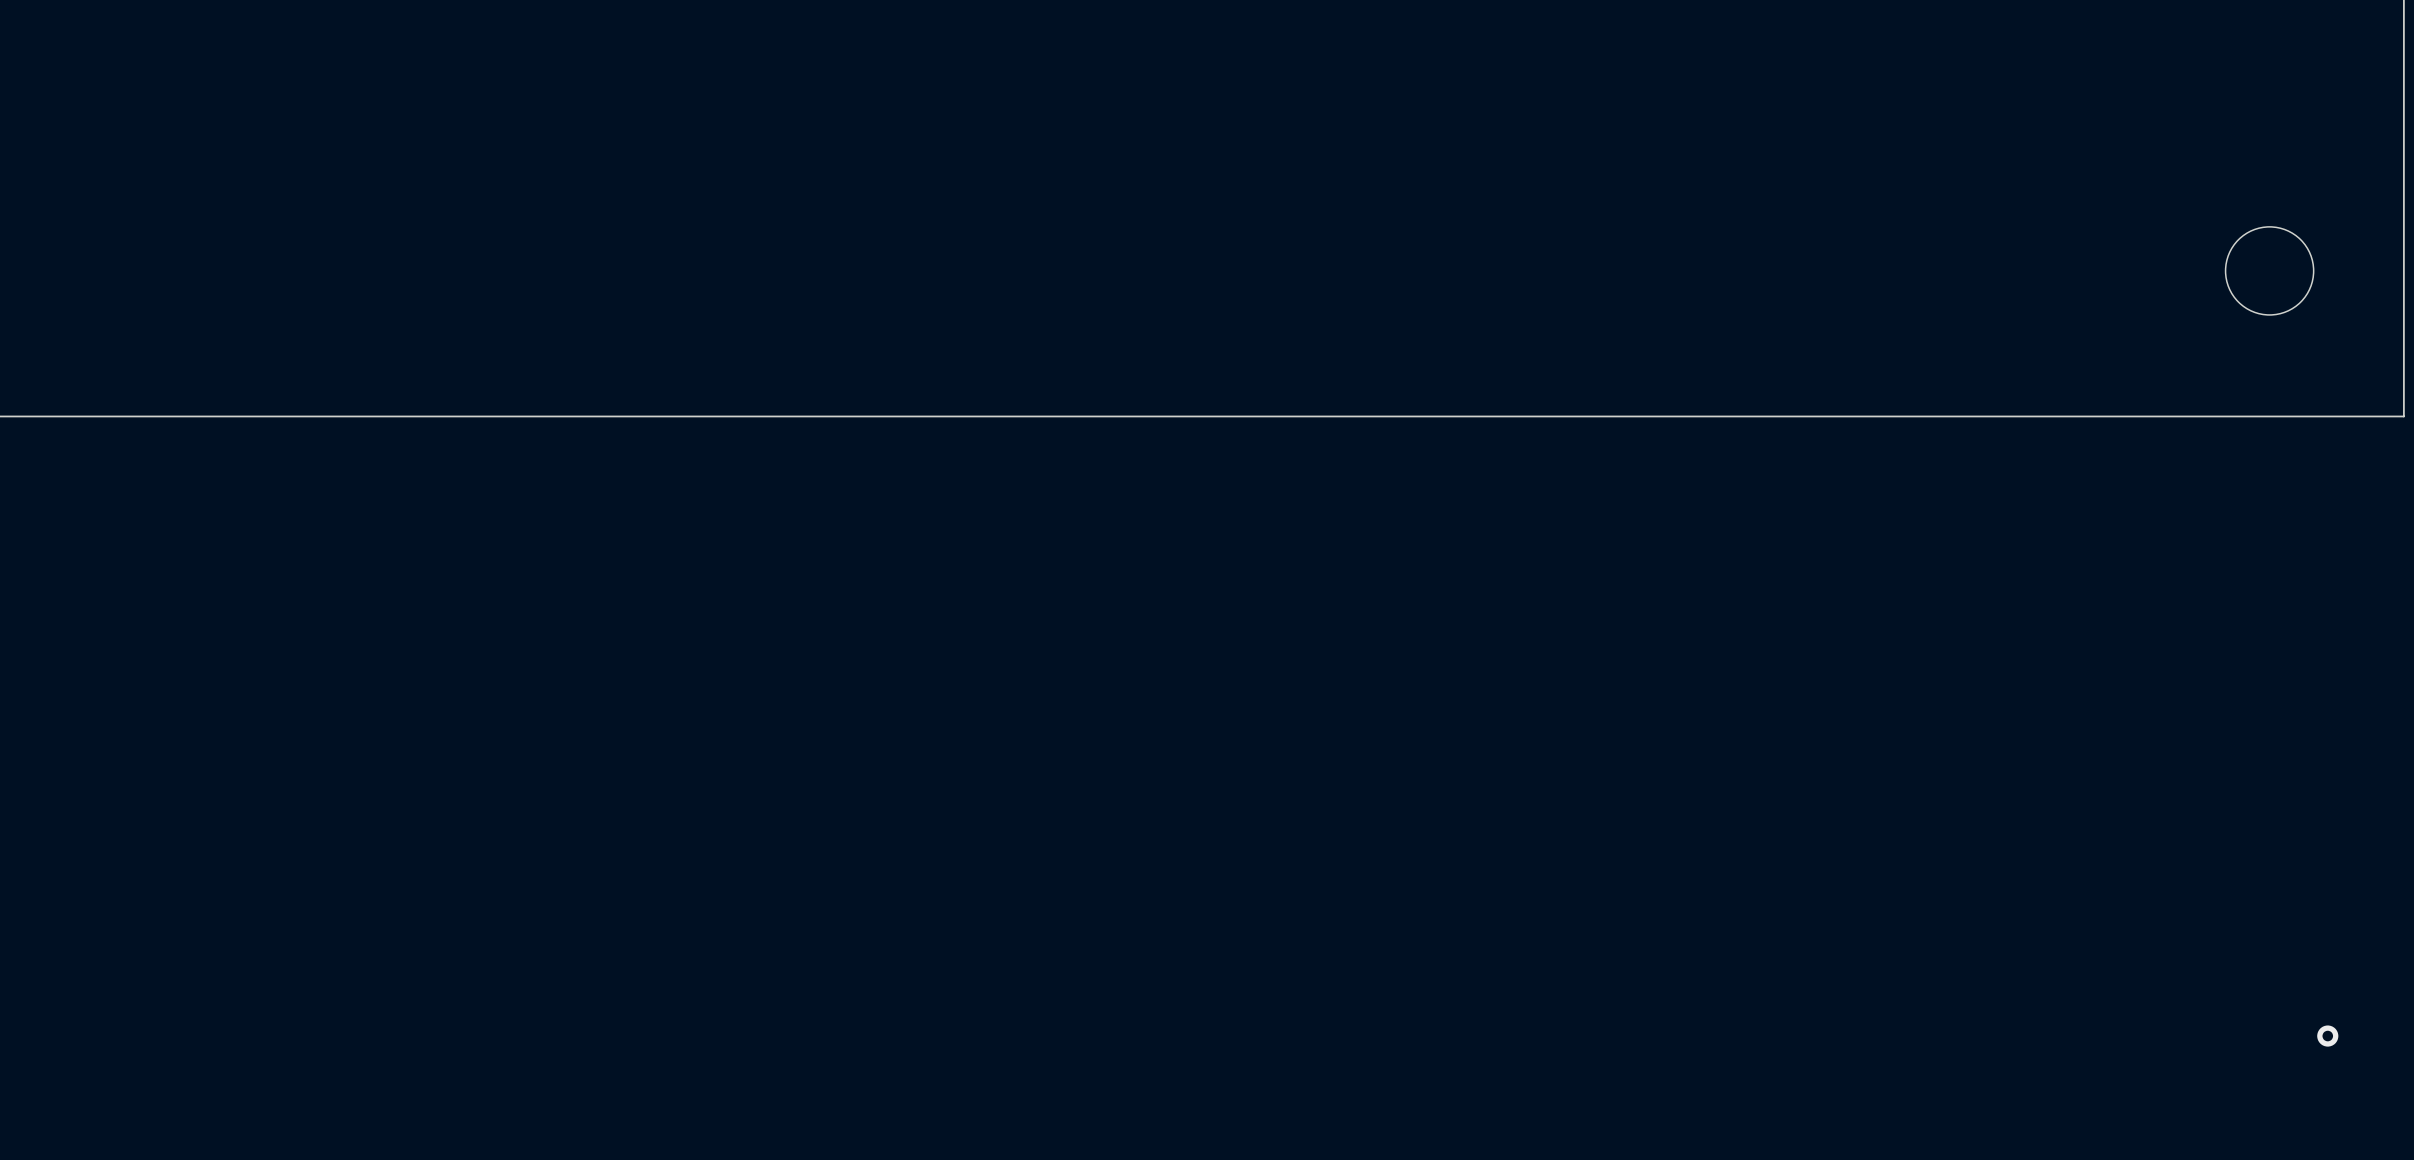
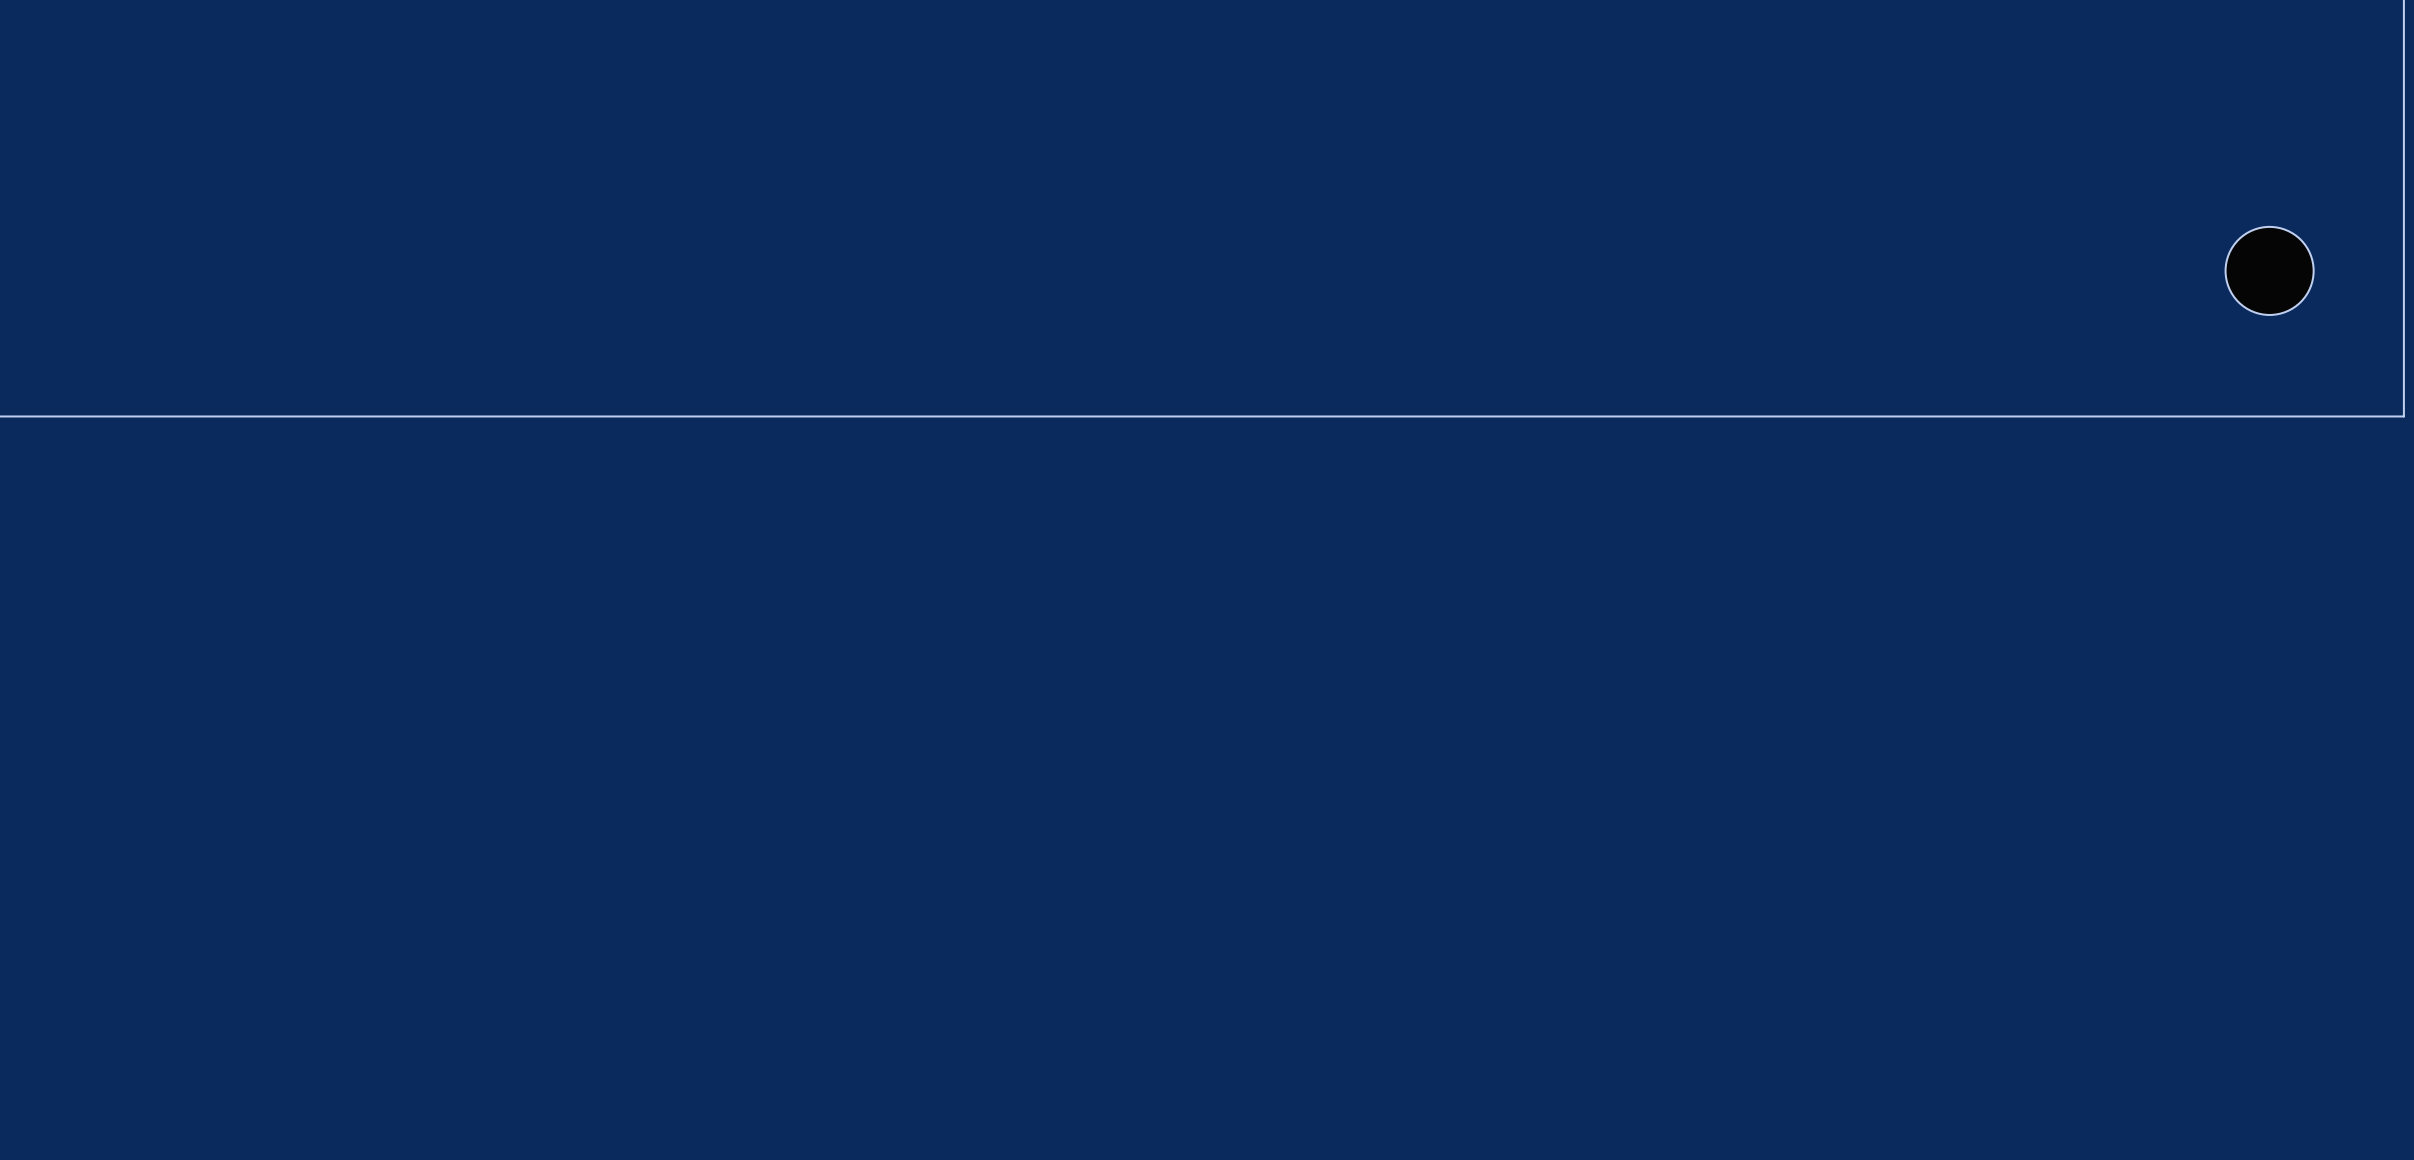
via: (2327, 1036) -> none

